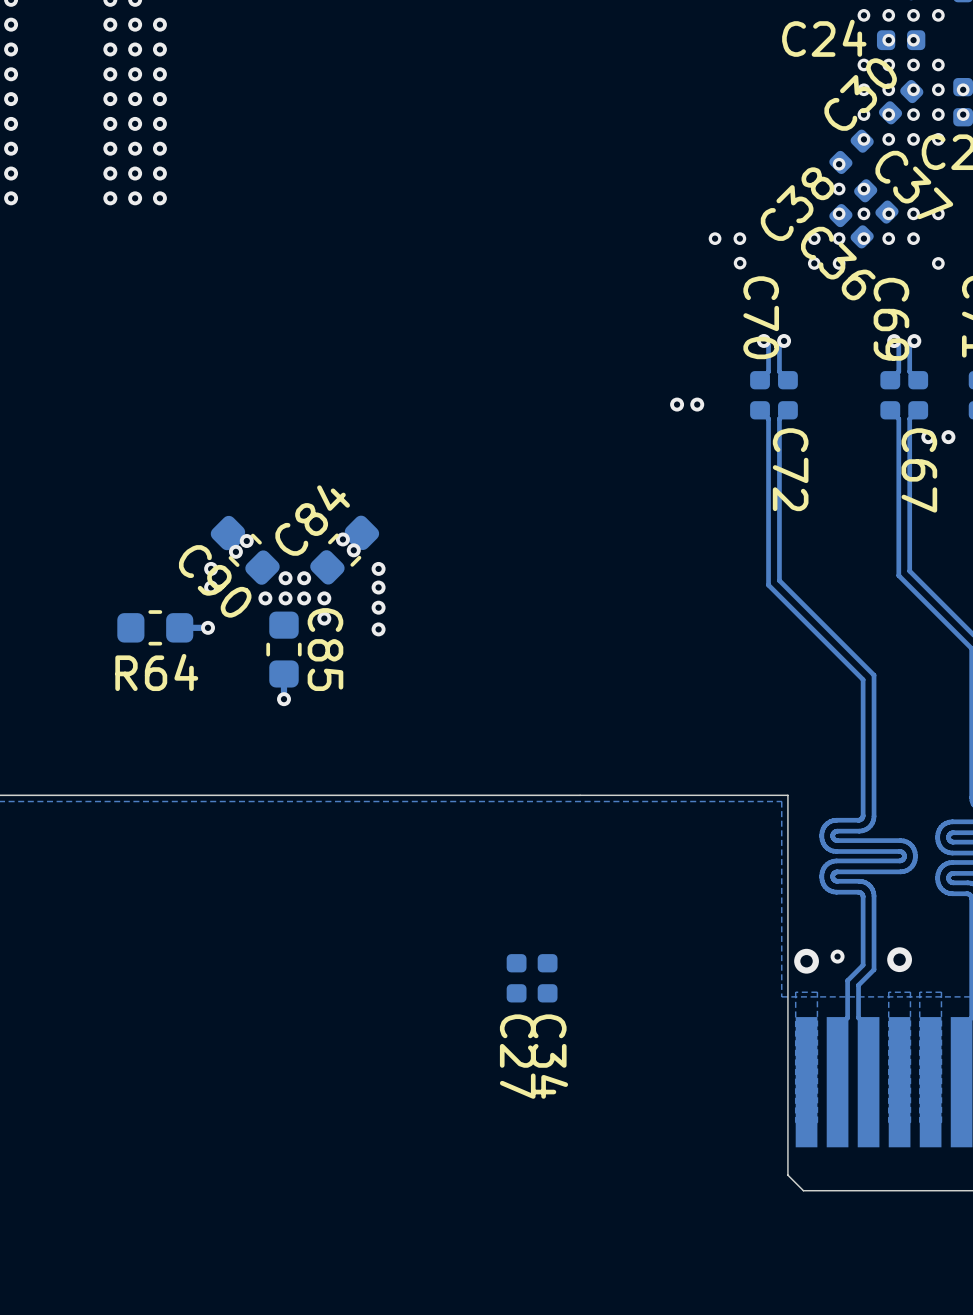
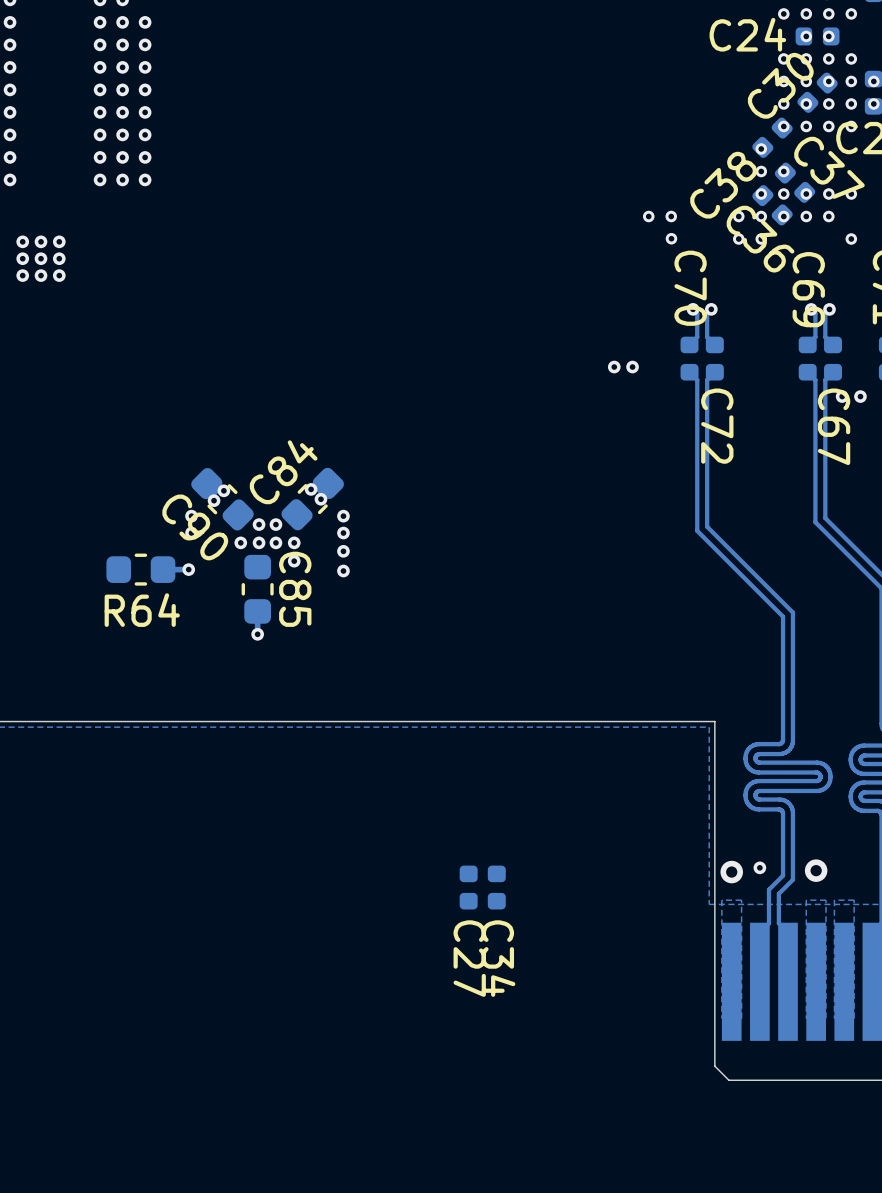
via: none -> (22, 241)
via: none -> (41, 241)
via: none -> (59, 241)
via: none -> (22, 258)
via: none -> (41, 258)
via: none -> (59, 258)
via: none -> (22, 275)
via: none -> (41, 275)
via: none -> (59, 275)

